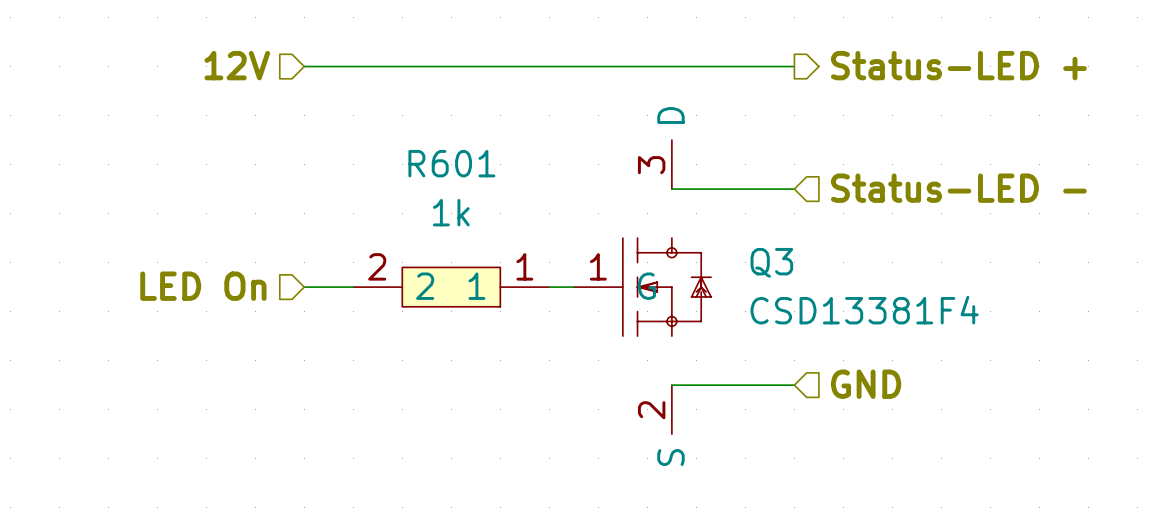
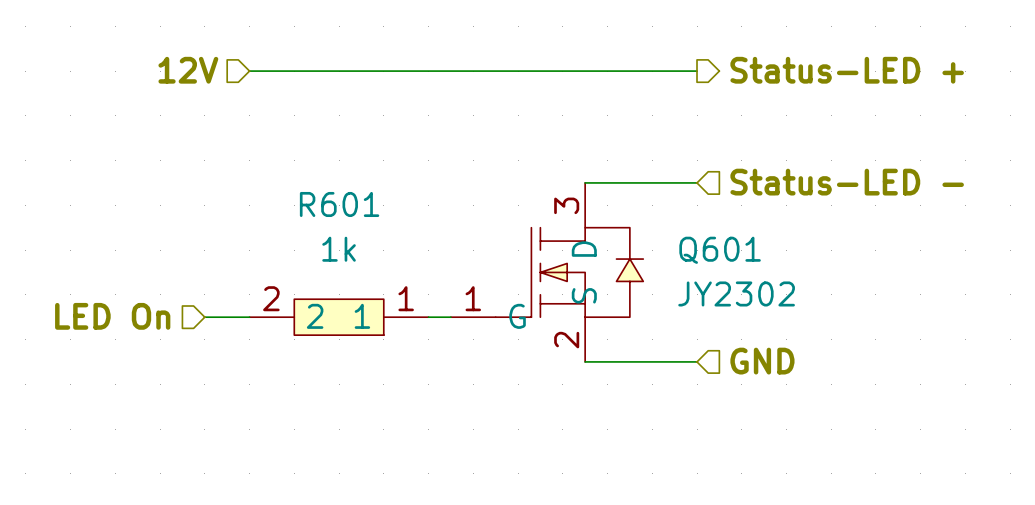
hierarchical label position: LED On (203, 286) -> LED On (112, 316)
wire: (304, 287) (353, 287) -> (204, 317) (249, 317)
R601 position: (451, 287) -> (339, 317)
wire: (549, 287) (573, 287) -> (428, 317) (450, 317)
Q601: none -> JY2302 (547, 272)
Q3: CSD13381F4 (642, 287) -> none

